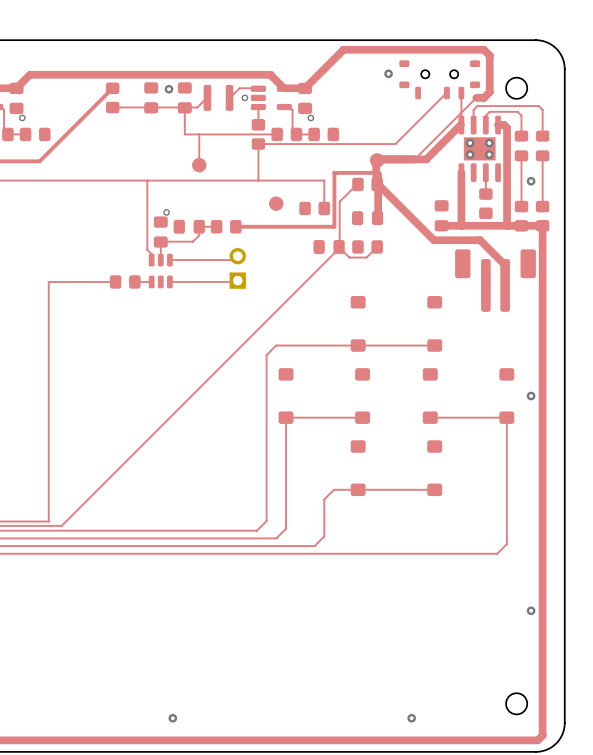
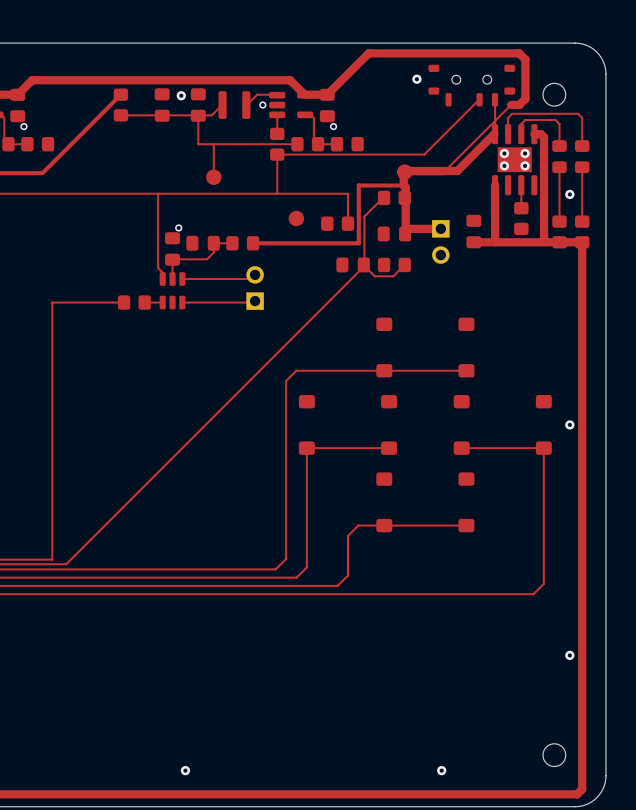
top track: (376, 172) (376, 182) (433, 240) (480, 240) (505, 265) (505, 286) -> none
top track: none -> (440, 228) (409, 228)
part: none -> (440, 241)
part: (495, 280) -> none

